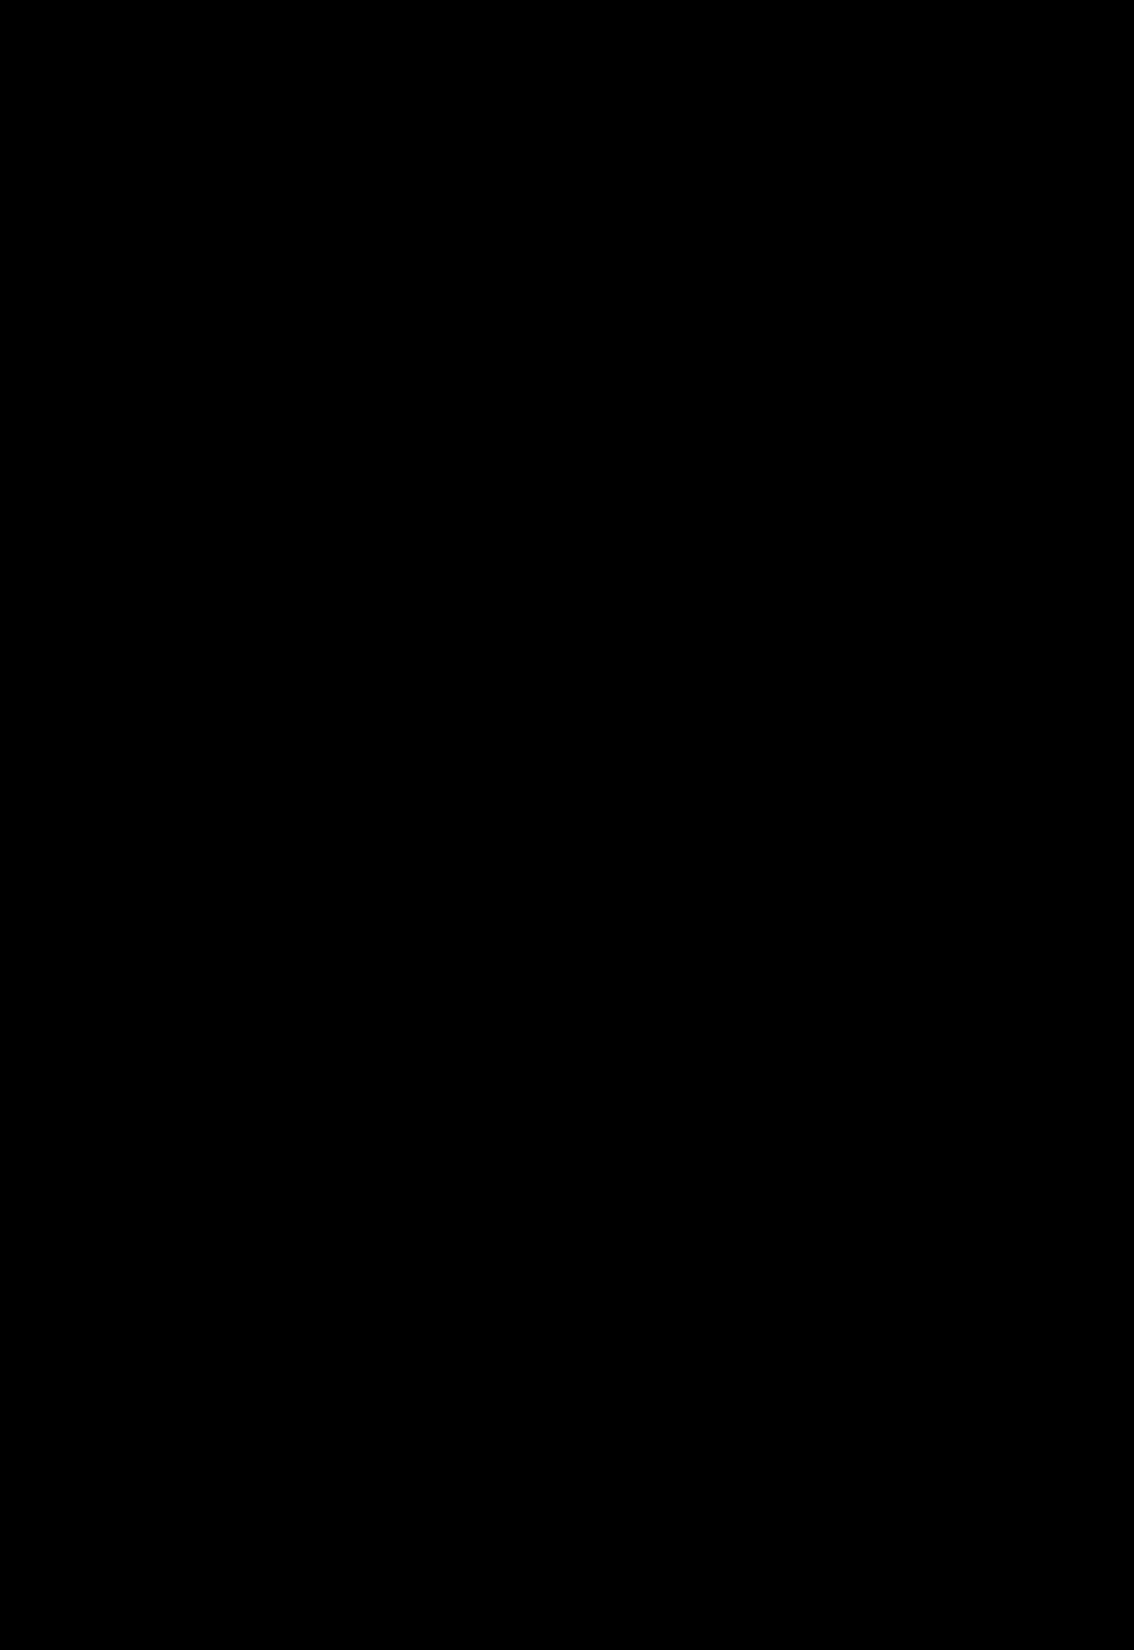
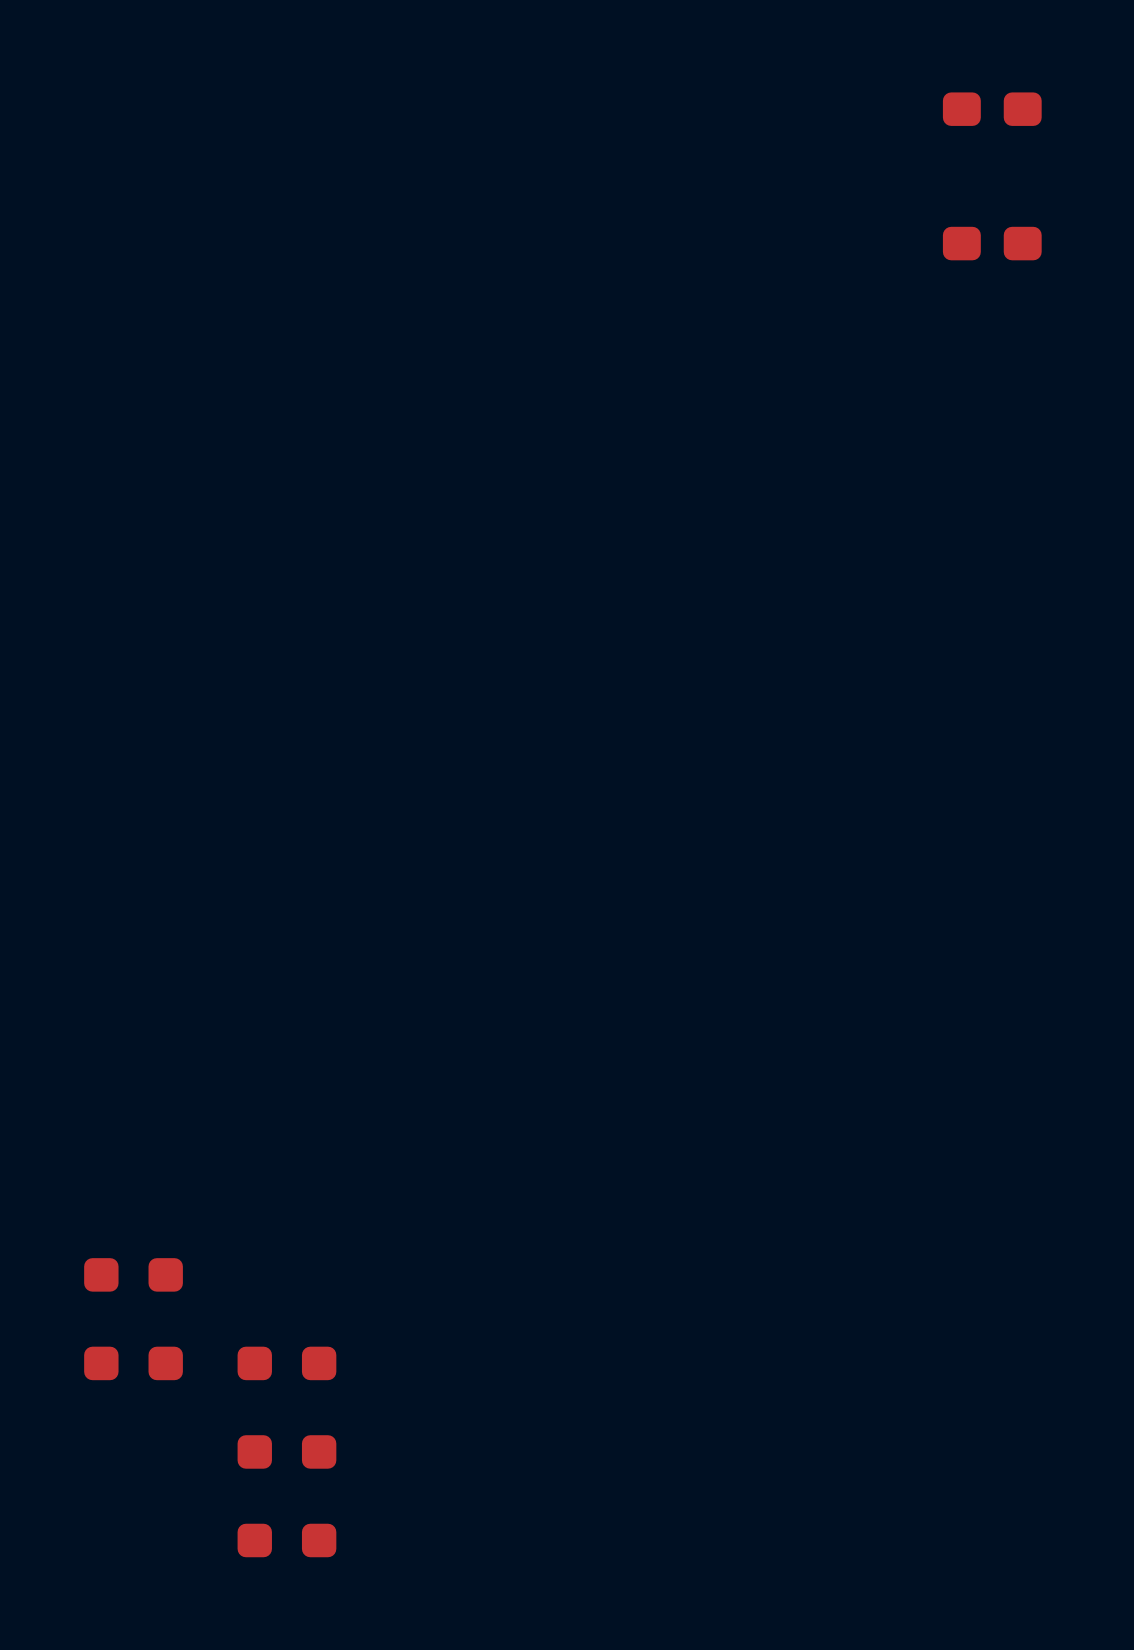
part: none -> (992, 109)
part: none -> (992, 243)
part: none -> (133, 1274)
part: none -> (133, 1363)
part: none -> (286, 1363)
part: none -> (286, 1451)
part: none -> (286, 1540)

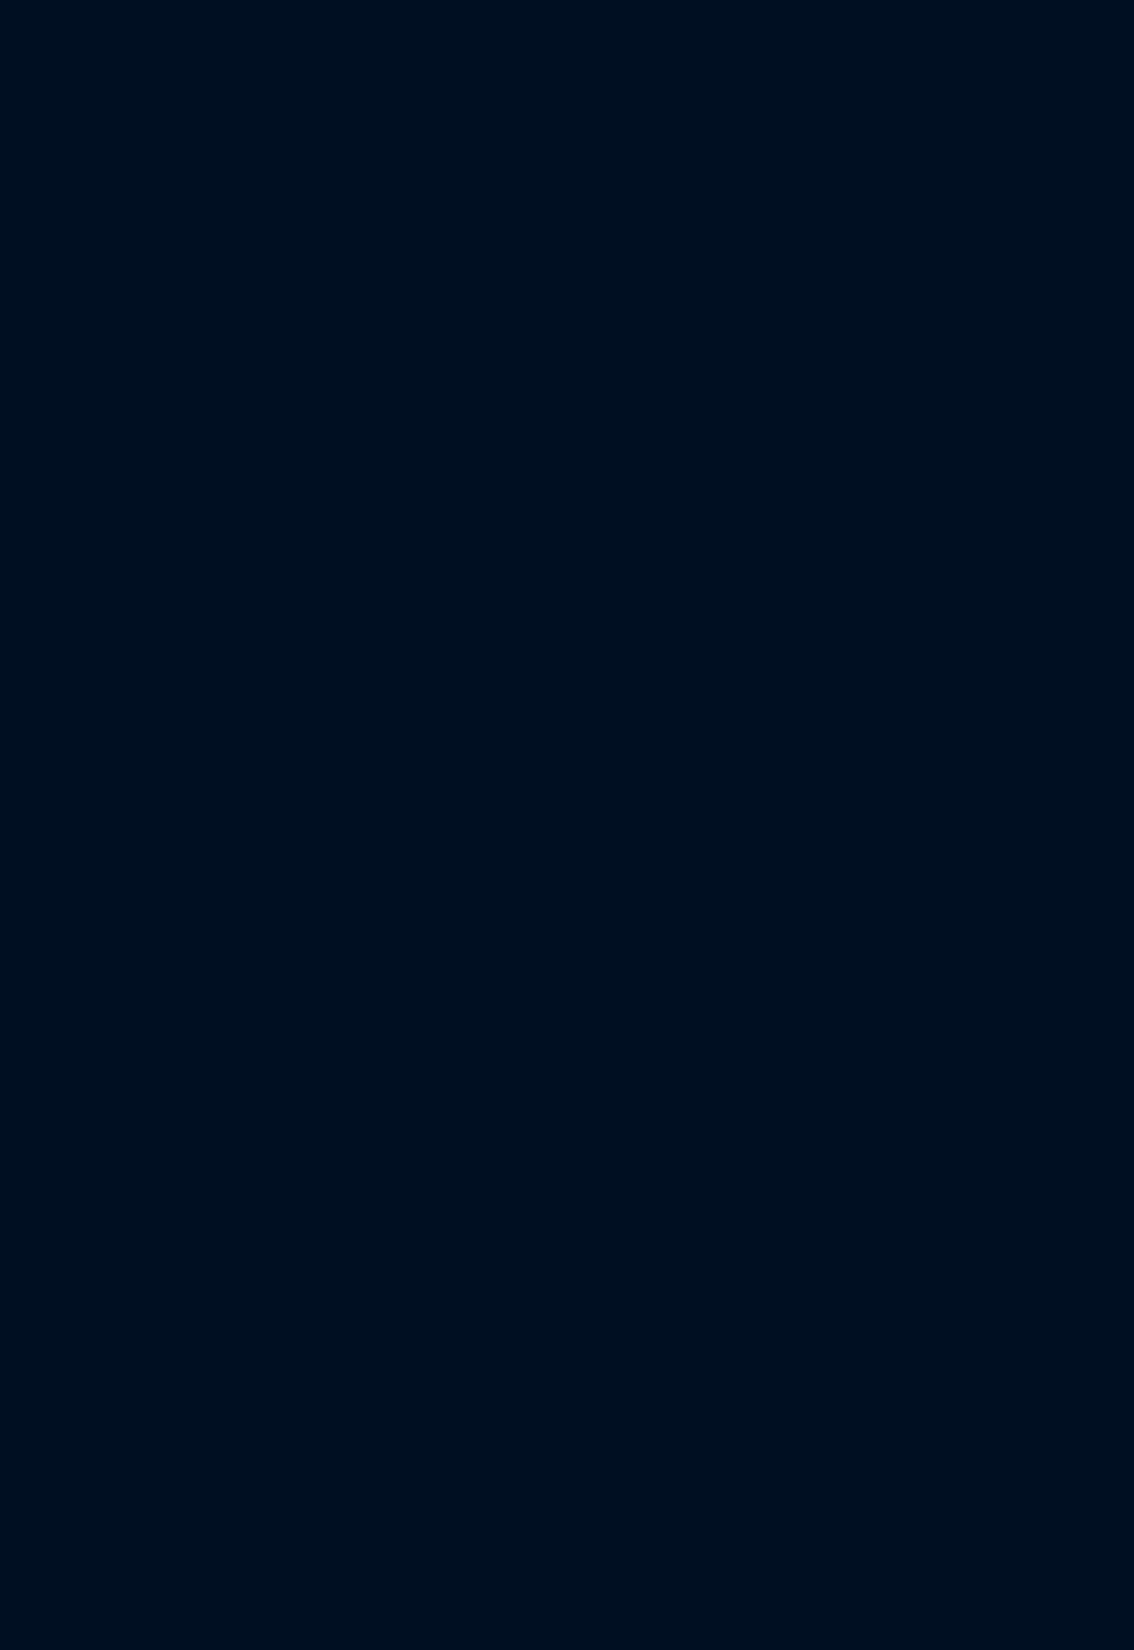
part: (992, 109) -> none
part: (992, 243) -> none
part: (133, 1274) -> none
part: (133, 1363) -> none
part: (286, 1363) -> none
part: (286, 1451) -> none
part: (286, 1540) -> none

